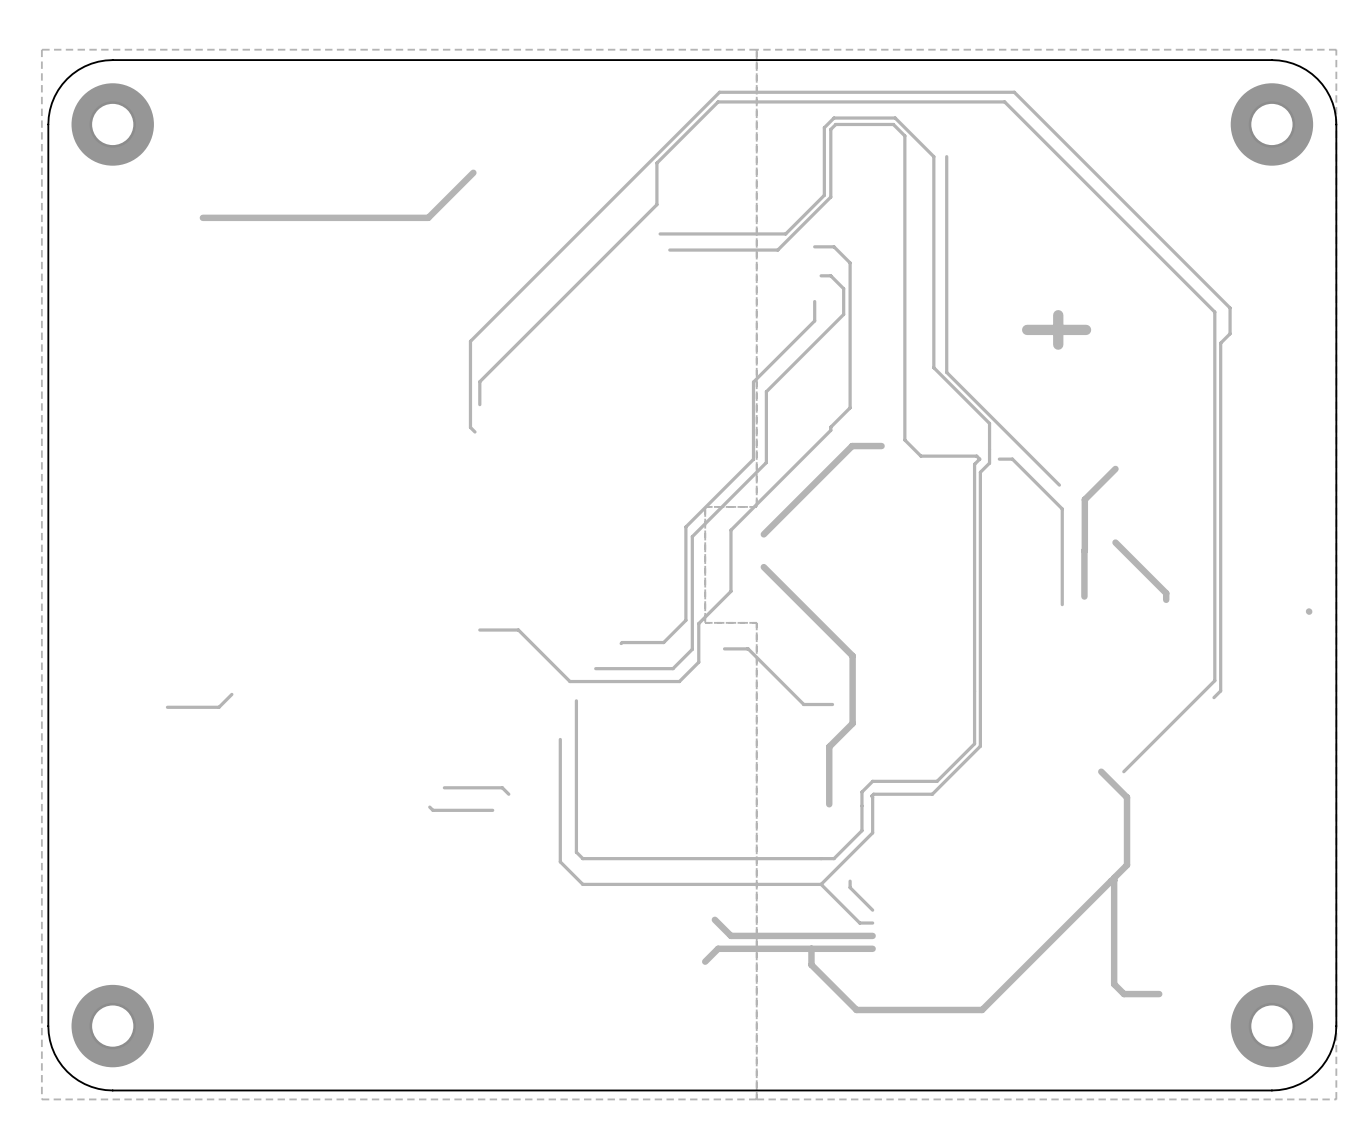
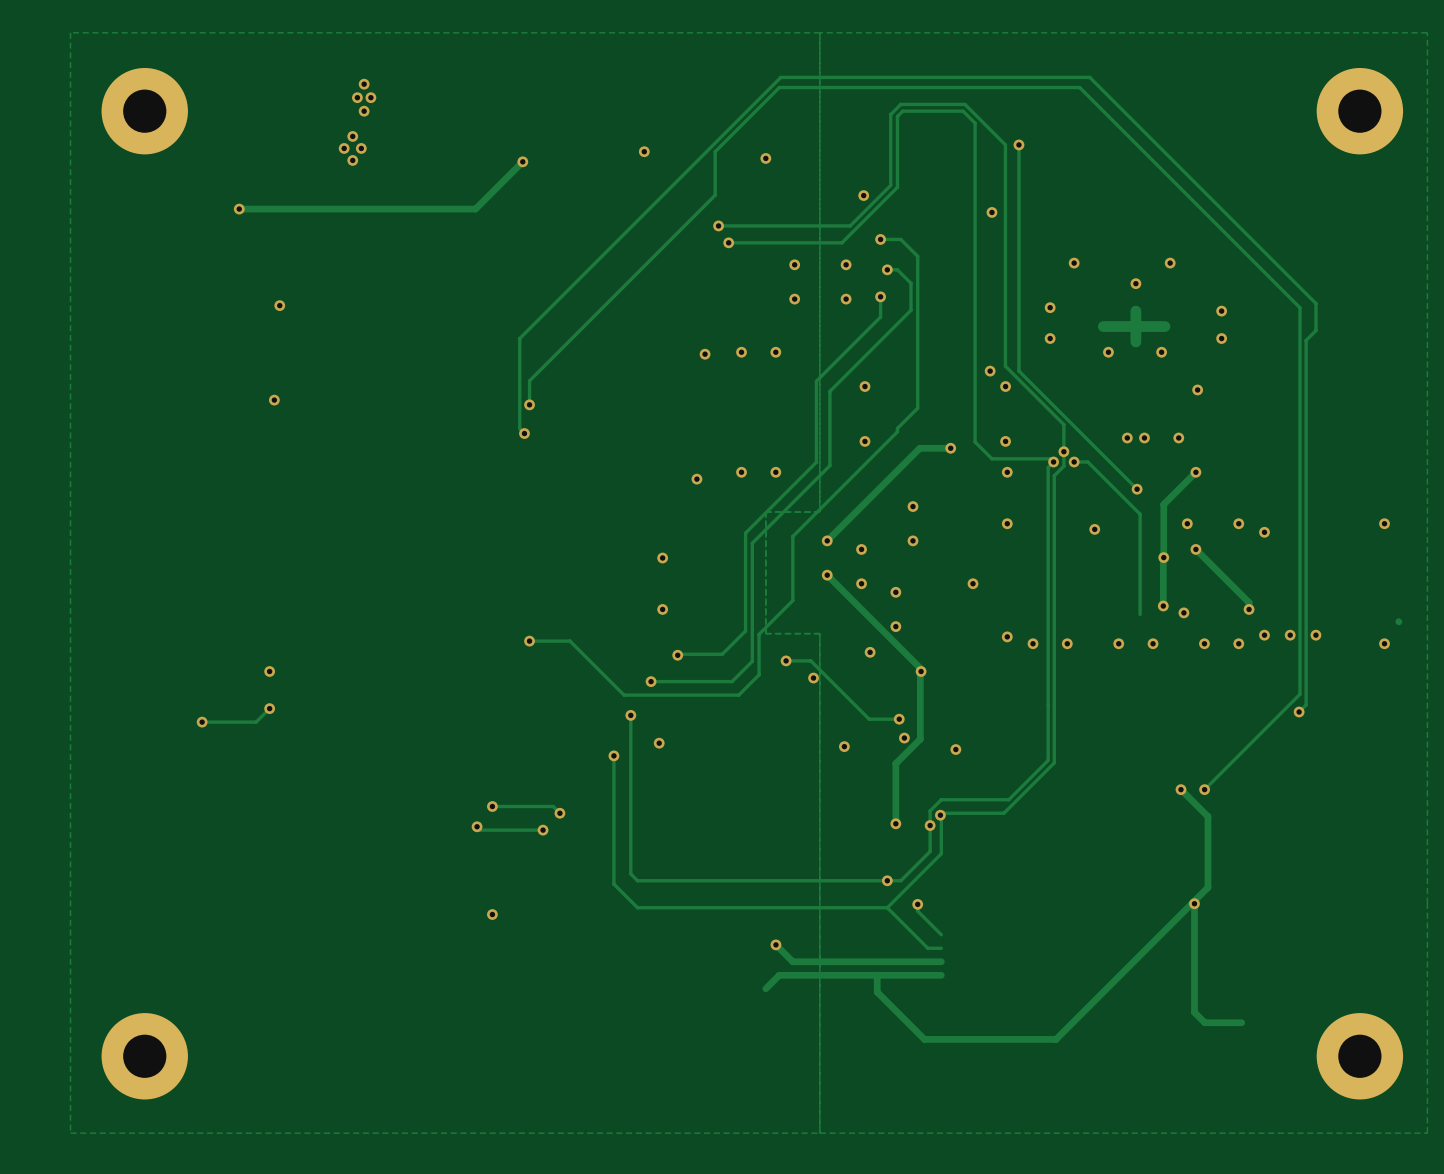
board edge: (1271, 60) (112, 60) (91, 63) (72, 74) (62, 84) (54, 96) (49, 110) (48, 124) (48, 1026) (51, 1047) (62, 1066) (72, 1076) (84, 1084) (98, 1088) (112, 1090) (1271, 1090) (1293, 1086) (1312, 1076) (1322, 1066) (1329, 1054) (1334, 1040) (1336, 1026) (1336, 124) (1334, 110) (1329, 96) (1317, 78) (1306, 69) (1293, 63) (1271, 60) -> none
via: none -> (364, 84)
via: none -> (357, 97)
via: none -> (370, 97)
via: none -> (364, 111)
via: none -> (352, 136)
via: none -> (1018, 144)
via: none -> (344, 148)
via: none -> (361, 148)
via: none -> (644, 151)
via: none -> (765, 158)
via: none -> (352, 160)
via: none -> (522, 161)
via: none -> (863, 195)
via: none -> (239, 209)
via: none -> (991, 212)
via: none -> (718, 225)
via: none -> (880, 239)
via: none -> (728, 242)
via: none -> (1074, 263)
via: none -> (1170, 263)
via: none -> (794, 264)
via: none -> (846, 264)
via: none -> (887, 269)
via: none -> (1135, 283)
via: none -> (880, 296)
via: none -> (794, 299)
via: none -> (846, 299)
via: none -> (279, 305)
via: none -> (1050, 307)
via: none -> (1221, 311)
via: none -> (1050, 338)
via: none -> (1221, 338)
via: none -> (741, 352)
via: none -> (775, 352)
via: none -> (1108, 352)
via: none -> (1161, 352)
via: none -> (705, 354)
via: none -> (990, 371)
via: none -> (864, 386)
via: none -> (1005, 386)
via: none -> (1197, 389)
via: none -> (274, 400)
via: none -> (529, 404)
via: none -> (524, 433)
via: none -> (1127, 437)
via: none -> (1144, 437)
via: none -> (1178, 437)
via: none -> (864, 441)
via: none -> (1005, 441)
via: none -> (950, 448)
via: none -> (1063, 451)
via: none -> (1053, 461)
via: none -> (1074, 461)
via: none -> (741, 472)
via: none -> (775, 472)
via: none -> (1007, 472)
via: none -> (1195, 472)
via: none -> (696, 479)
via: none -> (1137, 489)
via: none -> (912, 506)
via: none -> (1007, 523)
via: none -> (1187, 523)
via: none -> (1238, 523)
via: none -> (1384, 523)
via: none -> (1094, 529)
via: none -> (1264, 532)
via: none -> (827, 540)
via: none -> (912, 540)
via: none -> (861, 549)
via: none -> (1195, 549)
via: none -> (662, 558)
via: none -> (1163, 557)
via: none -> (827, 575)
via: none -> (861, 583)
via: none -> (973, 583)
via: none -> (895, 592)
via: none -> (1163, 606)
via: none -> (662, 609)
via: none -> (1249, 609)
via: none -> (1183, 612)
via: none -> (895, 626)
via: none -> (1264, 635)
via: none -> (1290, 635)
via: none -> (1315, 635)
via: none -> (1007, 636)
via: none -> (529, 641)
via: none -> (1033, 643)
via: none -> (1067, 643)
via: none -> (1118, 643)
via: none -> (1153, 643)
via: none -> (1204, 643)
via: none -> (1238, 643)
via: none -> (1384, 643)
via: none -> (870, 652)
via: none -> (677, 655)
via: none -> (786, 660)
via: none -> (269, 671)
via: none -> (921, 671)
via: none -> (813, 678)
via: none -> (651, 681)
via: none -> (269, 708)
via: none -> (1299, 711)
via: none -> (630, 715)
via: none -> (899, 719)
via: none -> (202, 722)
via: none -> (904, 738)
via: none -> (659, 743)
via: none -> (844, 746)
via: none -> (955, 749)
via: none -> (613, 755)
via: none -> (1180, 789)
via: none -> (1204, 789)
via: none -> (492, 806)
via: none -> (559, 813)
via: none -> (940, 815)
via: none -> (895, 823)
via: none -> (930, 825)
via: none -> (477, 826)
via: none -> (543, 830)
via: none -> (887, 880)
via: none -> (1194, 903)
via: none -> (917, 904)
via: none -> (492, 914)
via: none -> (775, 944)

